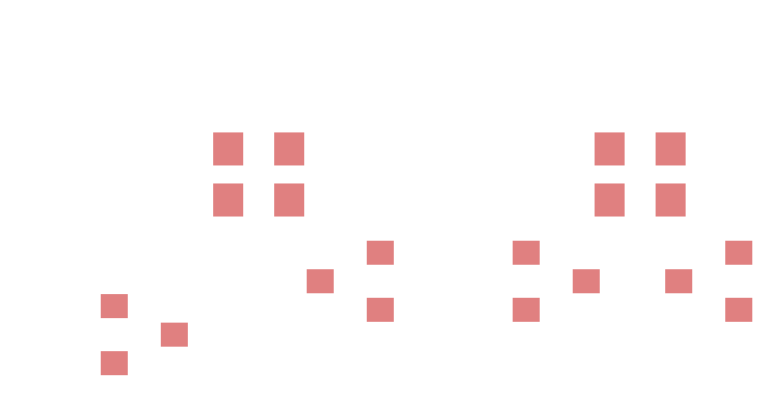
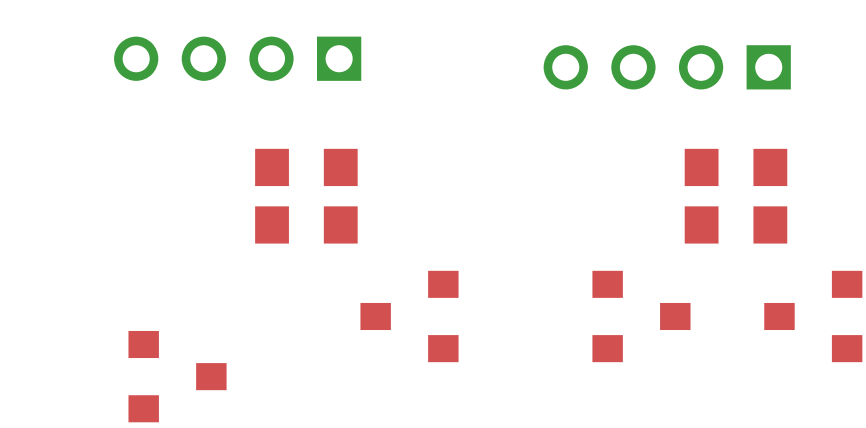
part: none -> (237, 58)
part: none -> (667, 67)

